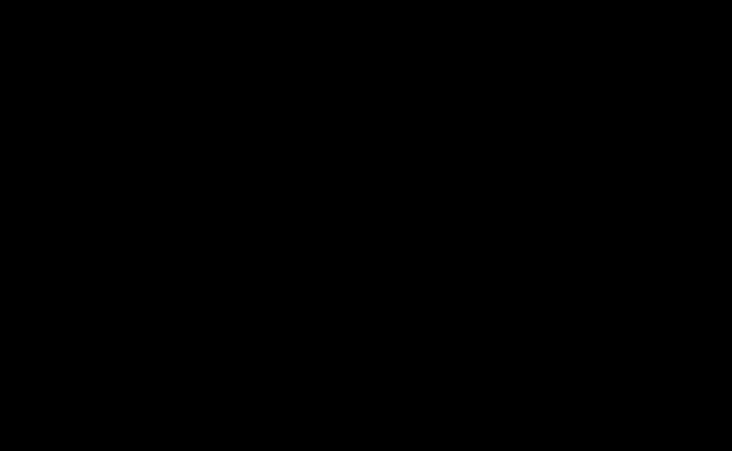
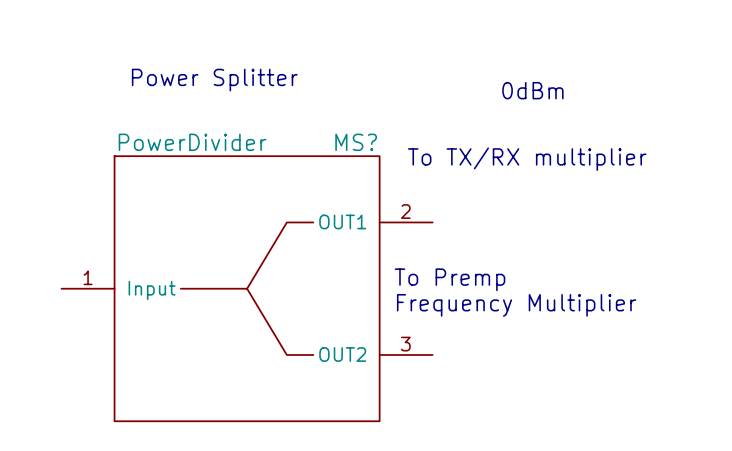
text: none -> Power Splitter (214, 80)
text: none -> 0dBm (532, 90)
text: none -> To TX/RX multiplier (527, 159)
text: none -> To Premp (449, 279)
MS?: none -> PowerDivider (247, 288)
text: none -> Frequency Multiplier (516, 305)

